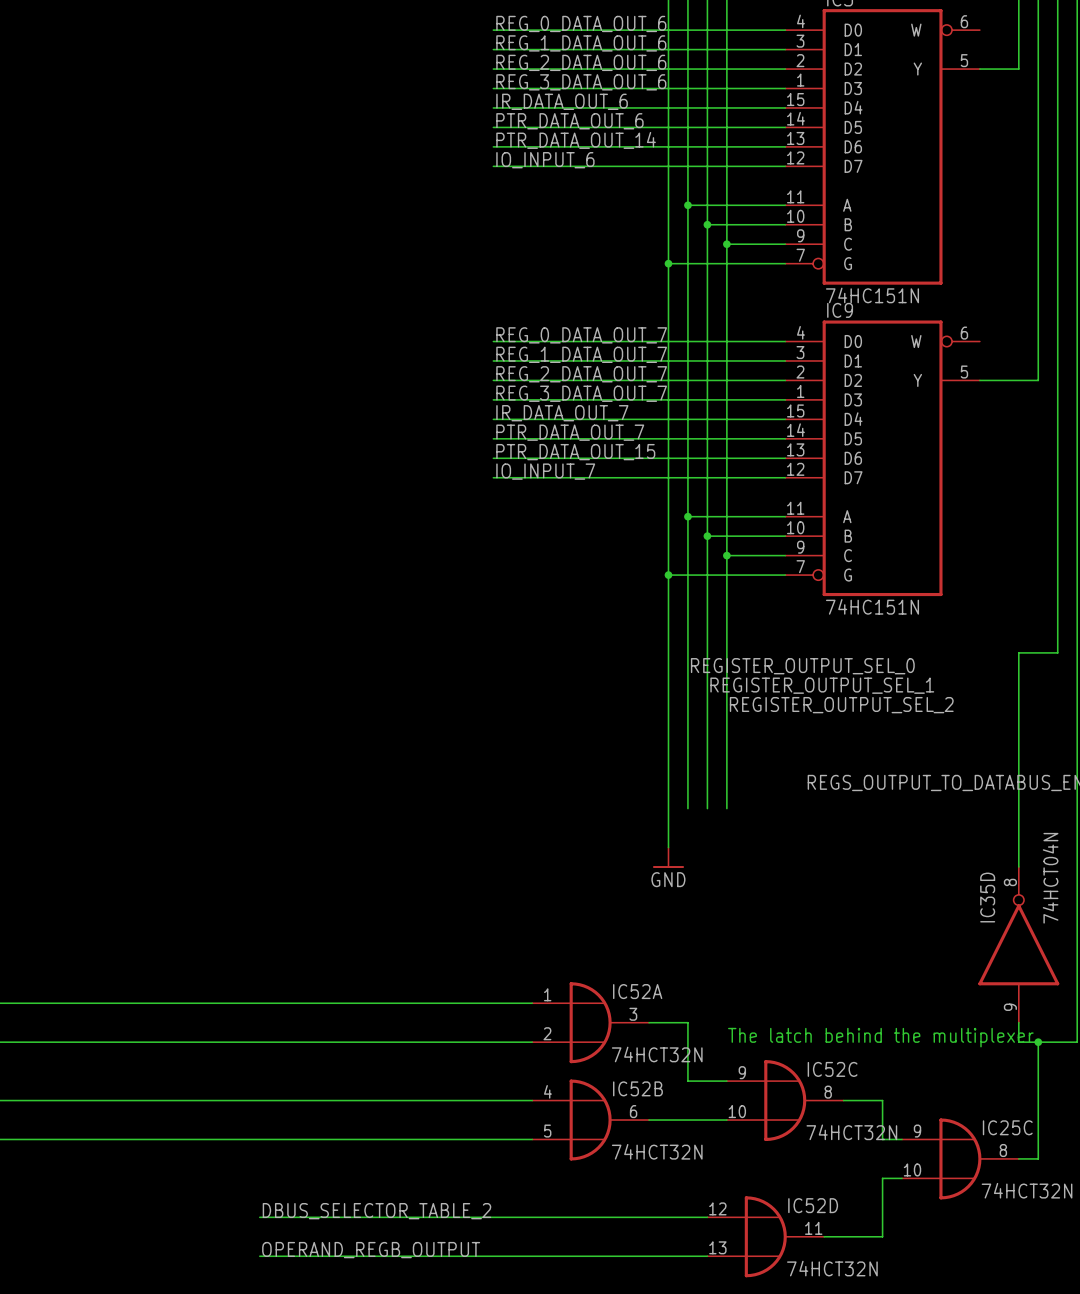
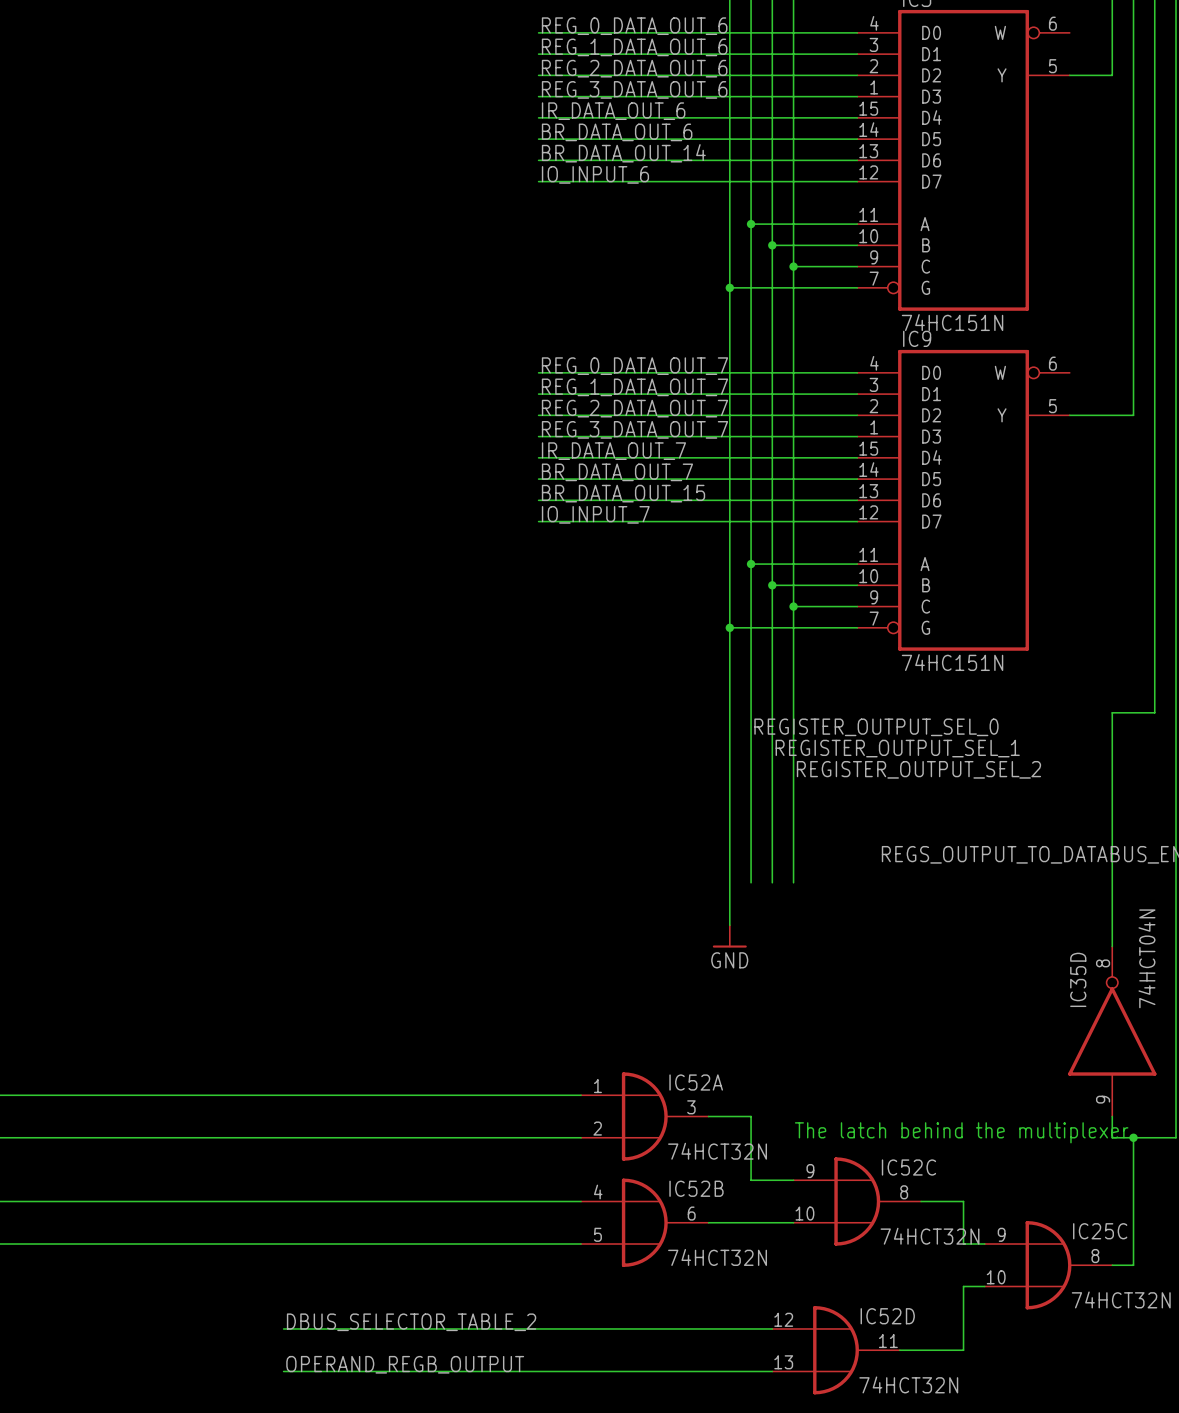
label: PTR_DATA_OUT_6 (569, 121) -> BR_DATA_OUT_6 (617, 132)
label: PTR_DATA_OUT_14 (576, 140) -> BR_DATA_OUT_14 (623, 153)
label: PTR_DATA_OUT_7 (570, 432) -> BR_DATA_OUT_7 (617, 472)
label: PTR_DATA_OUT_15 (575, 452) -> BR_DATA_OUT_15 (623, 493)

